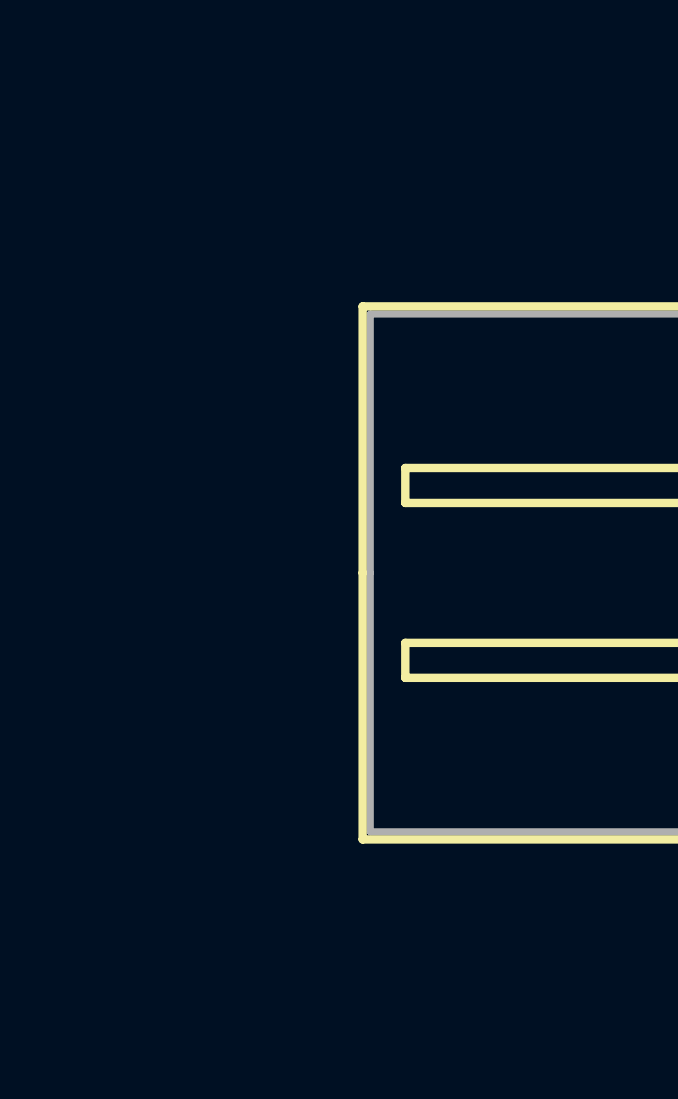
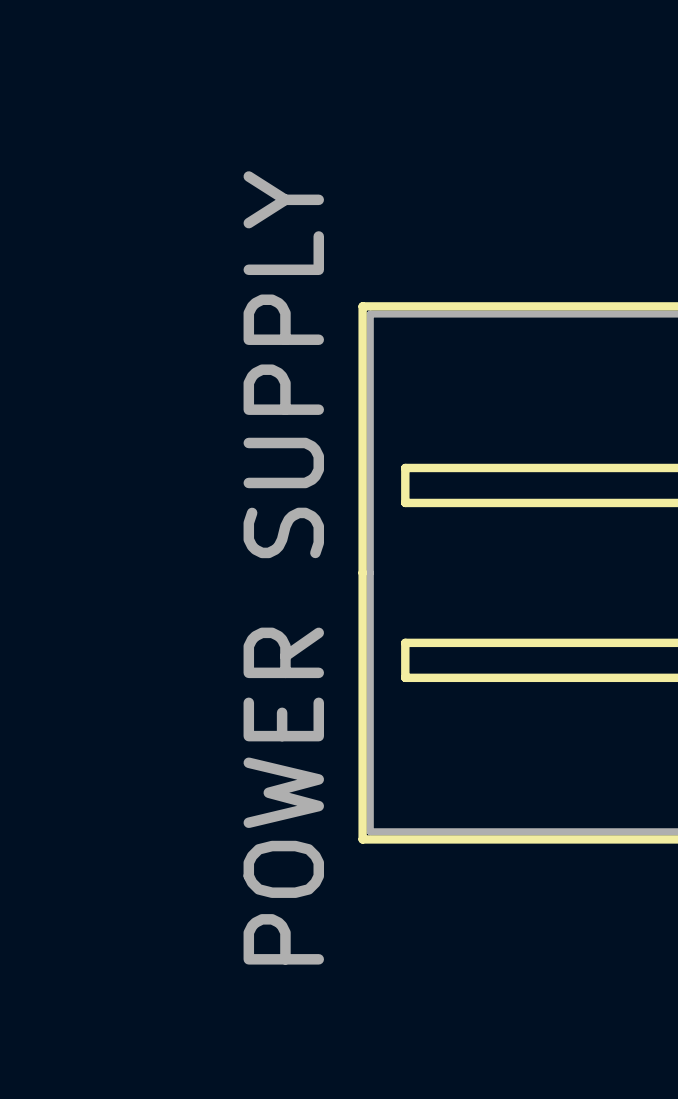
part value: none -> POWER SUPPLY (283, 567)

